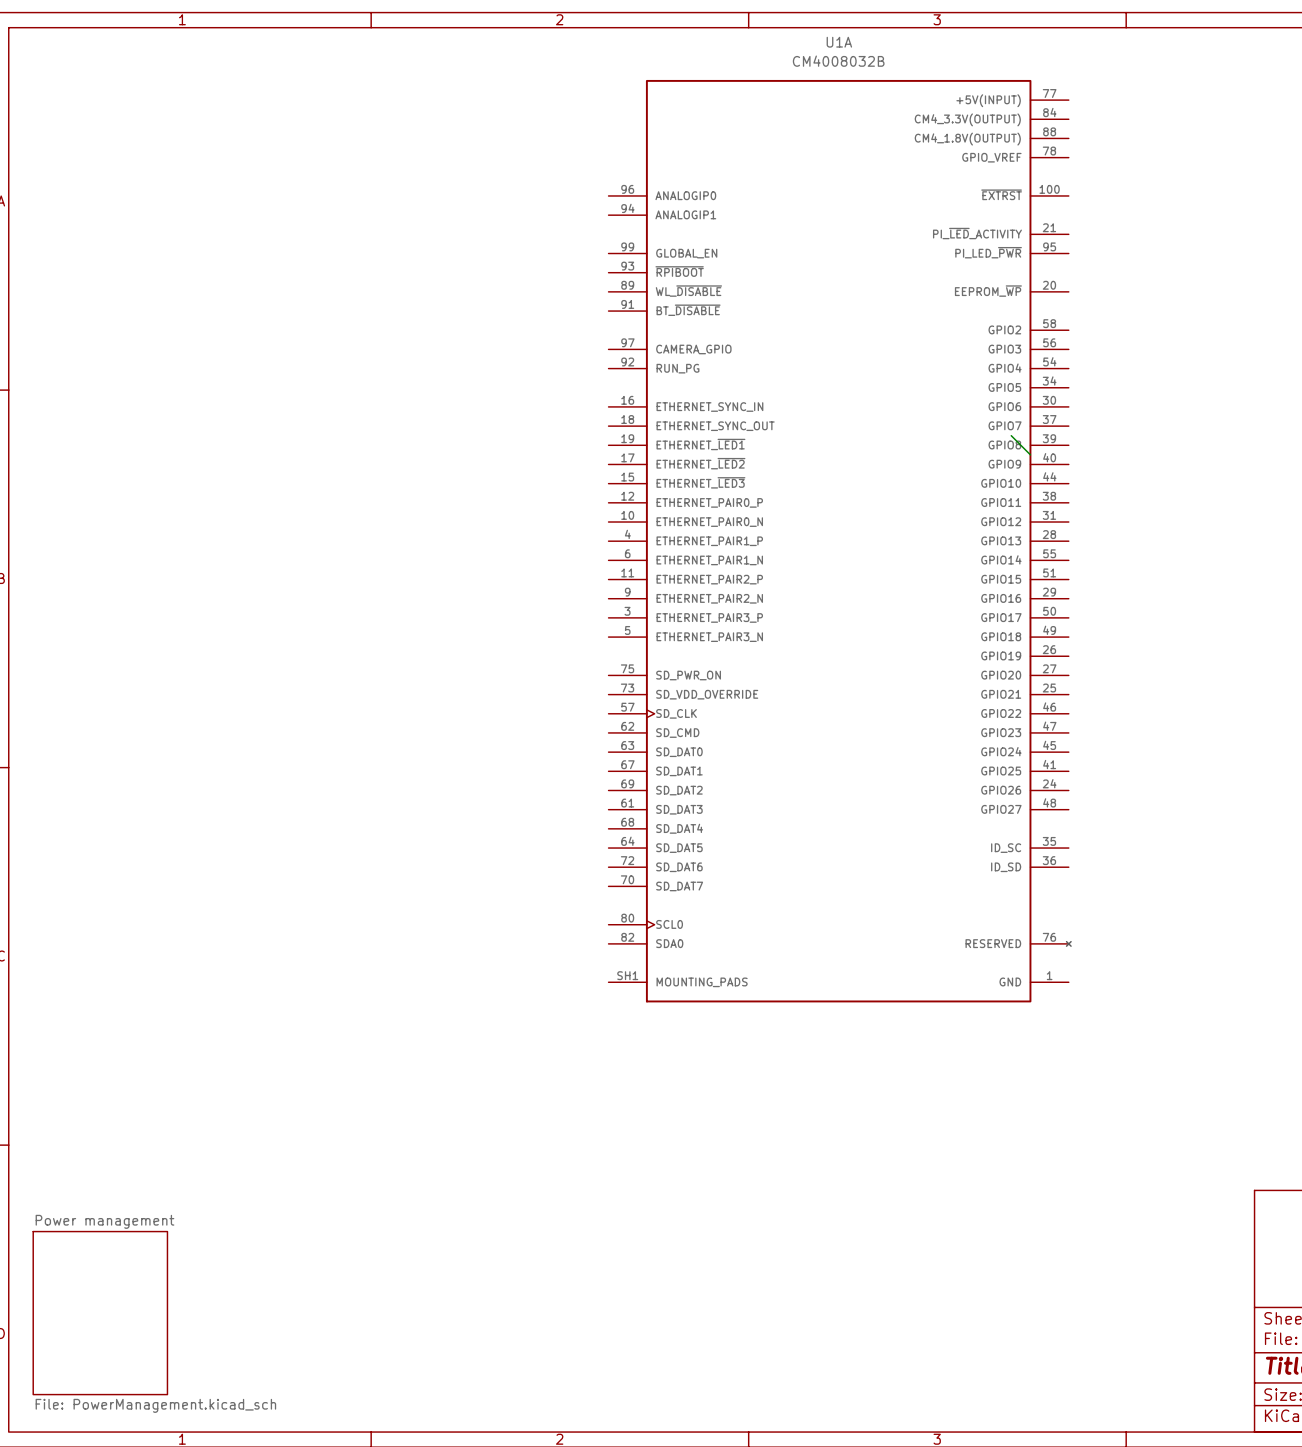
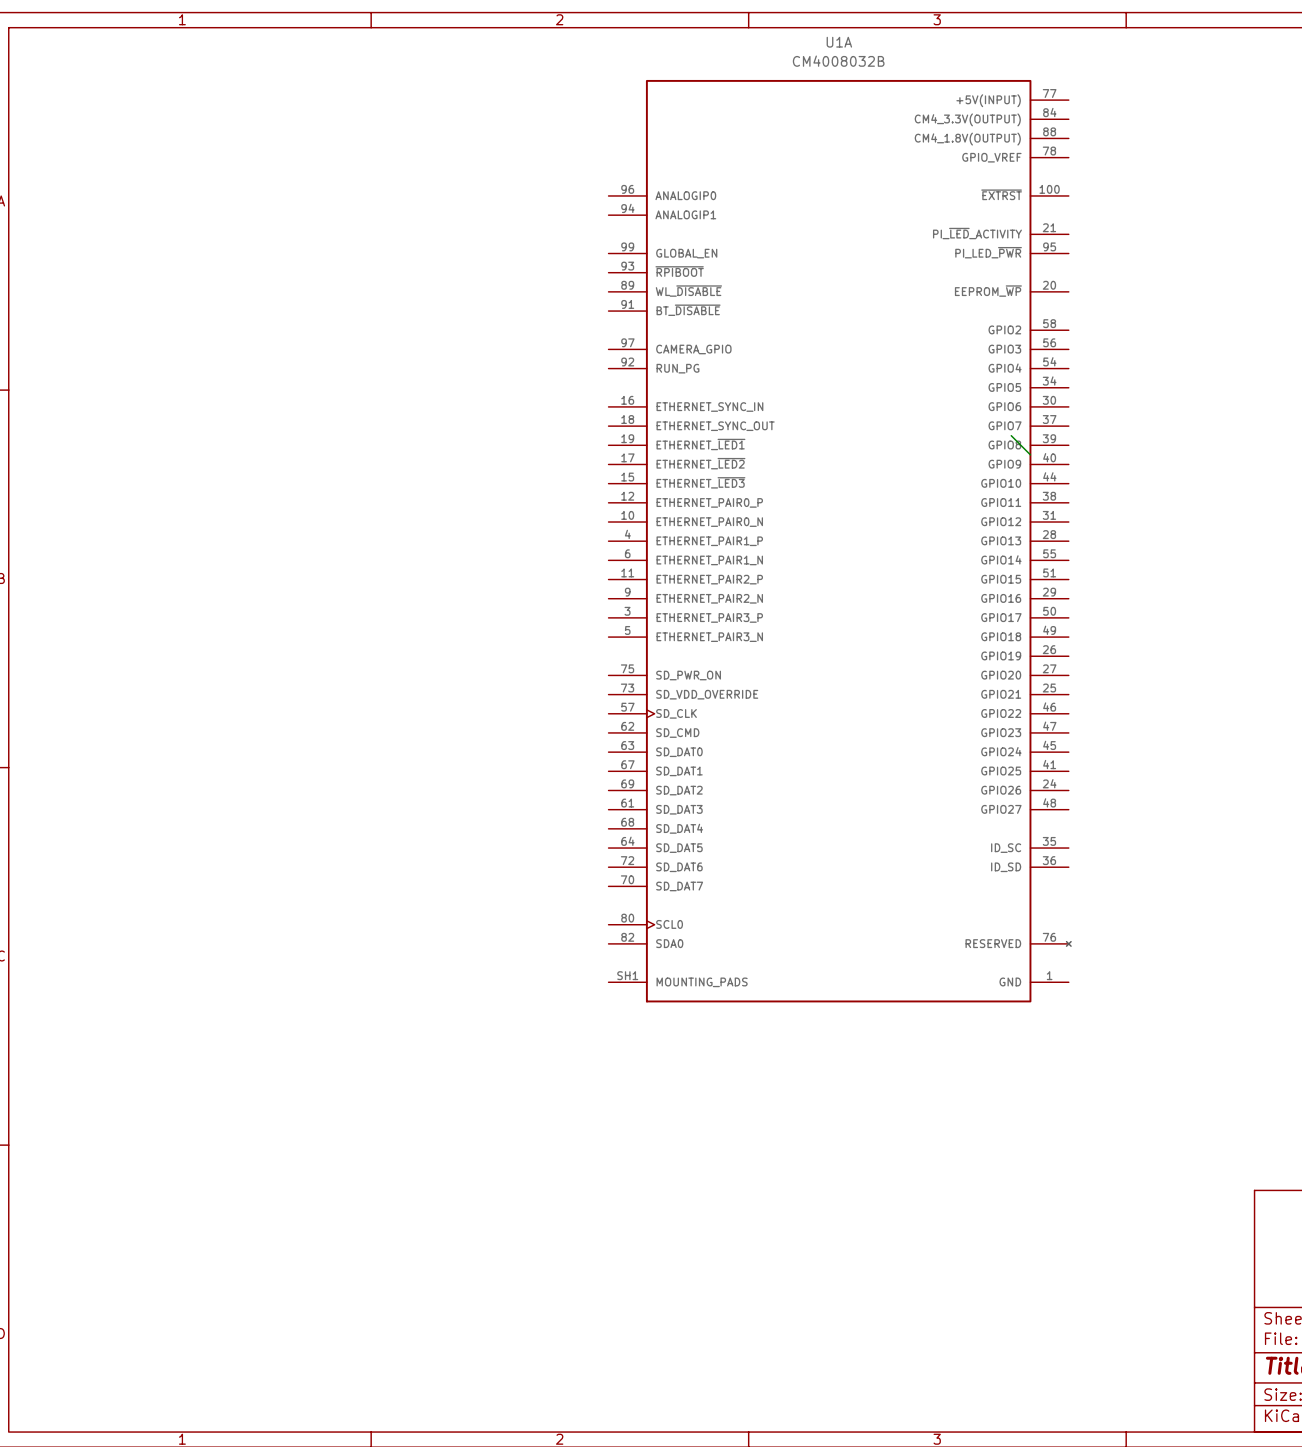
sheet Power management: File: PowerManagement.kicad_sch (100, 1313) -> none

